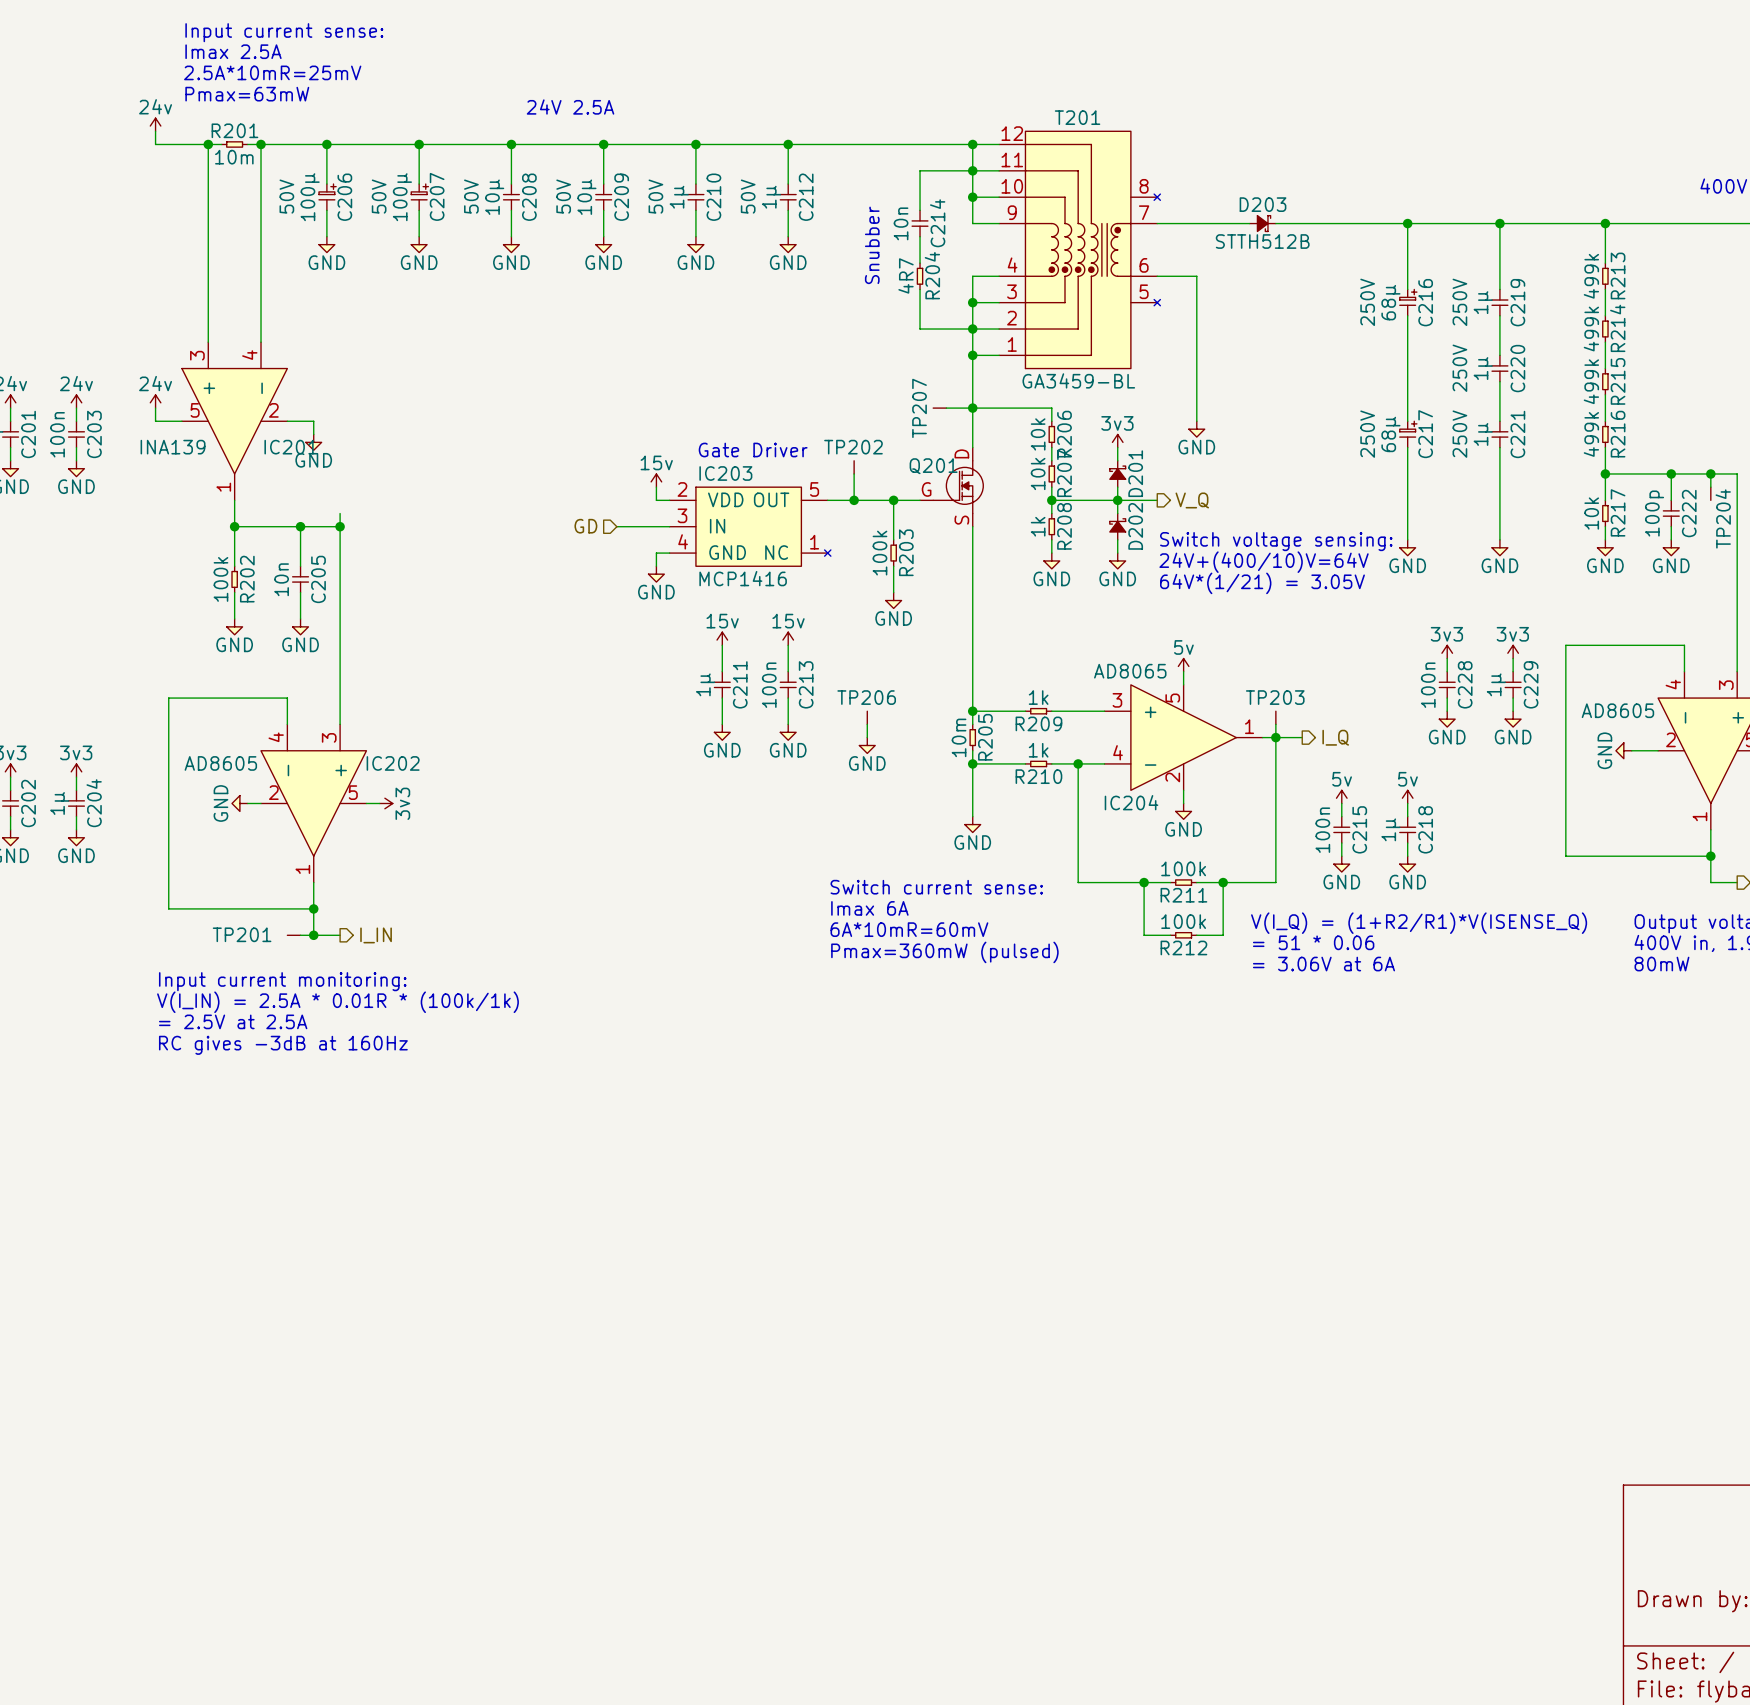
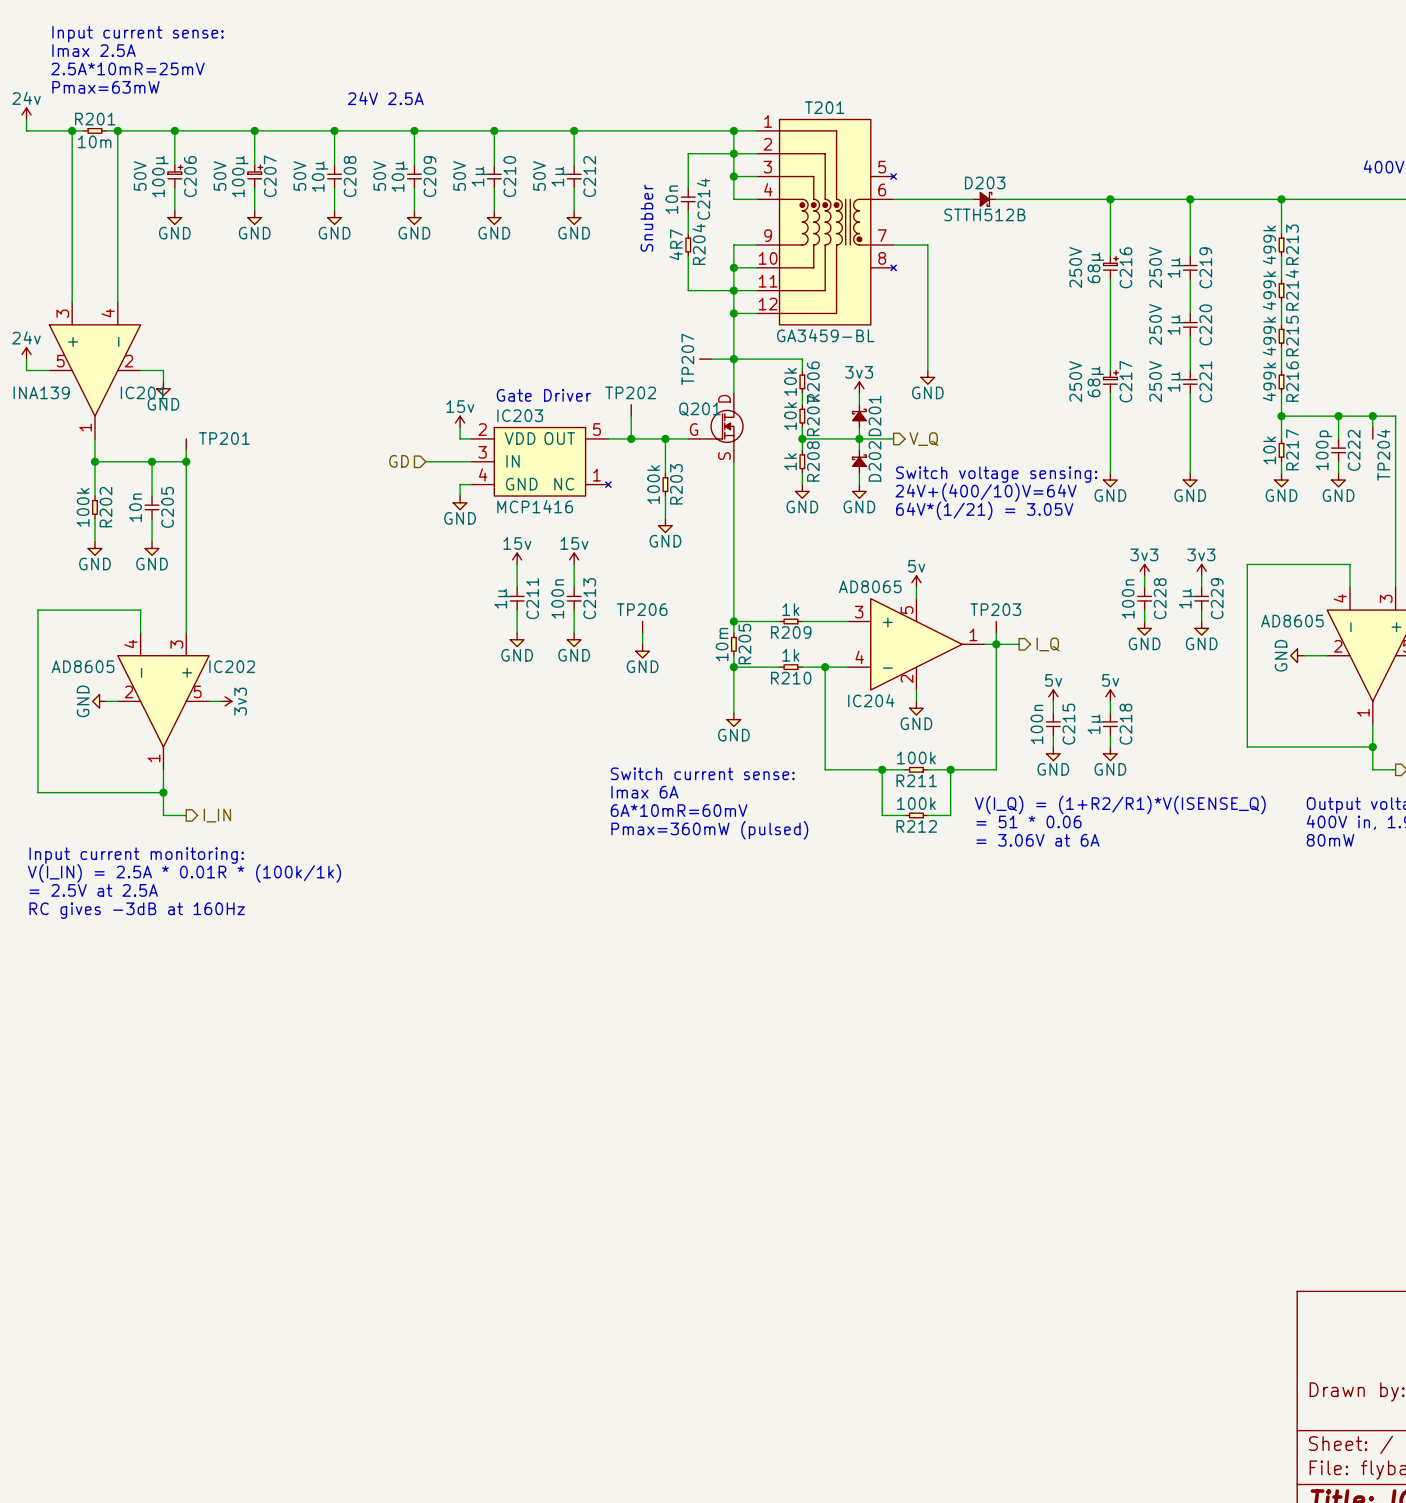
T201 flip: as is (1092, 249) -> up-down (837, 222)
TP201 name position: TP201 (242, 934) -> TP201 (224, 438)
TP201 rotation: 0° (287, 935) -> 90° clockwise (186, 438)
TP201 position: (290, 935) -> (186, 442)
wire: (300, 935) (313, 935) -> none
junction: (313, 935) -> none

